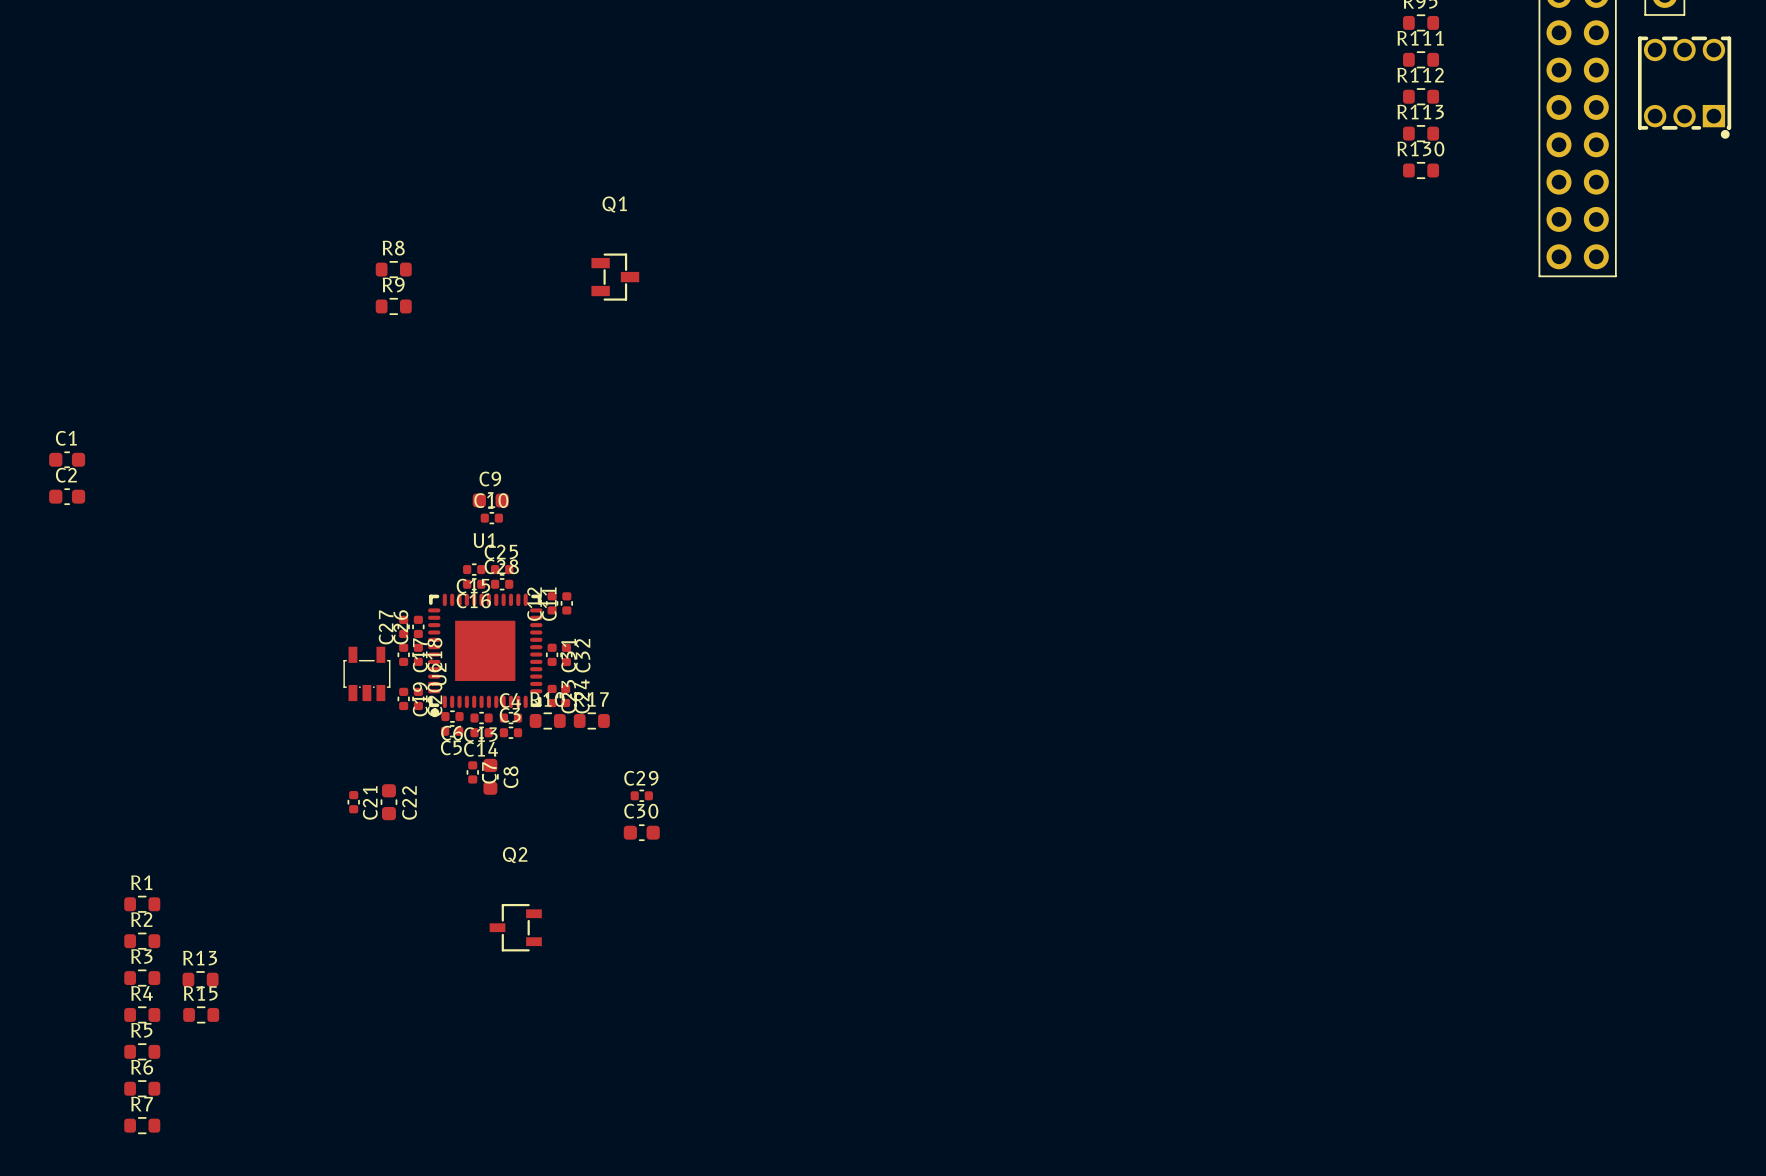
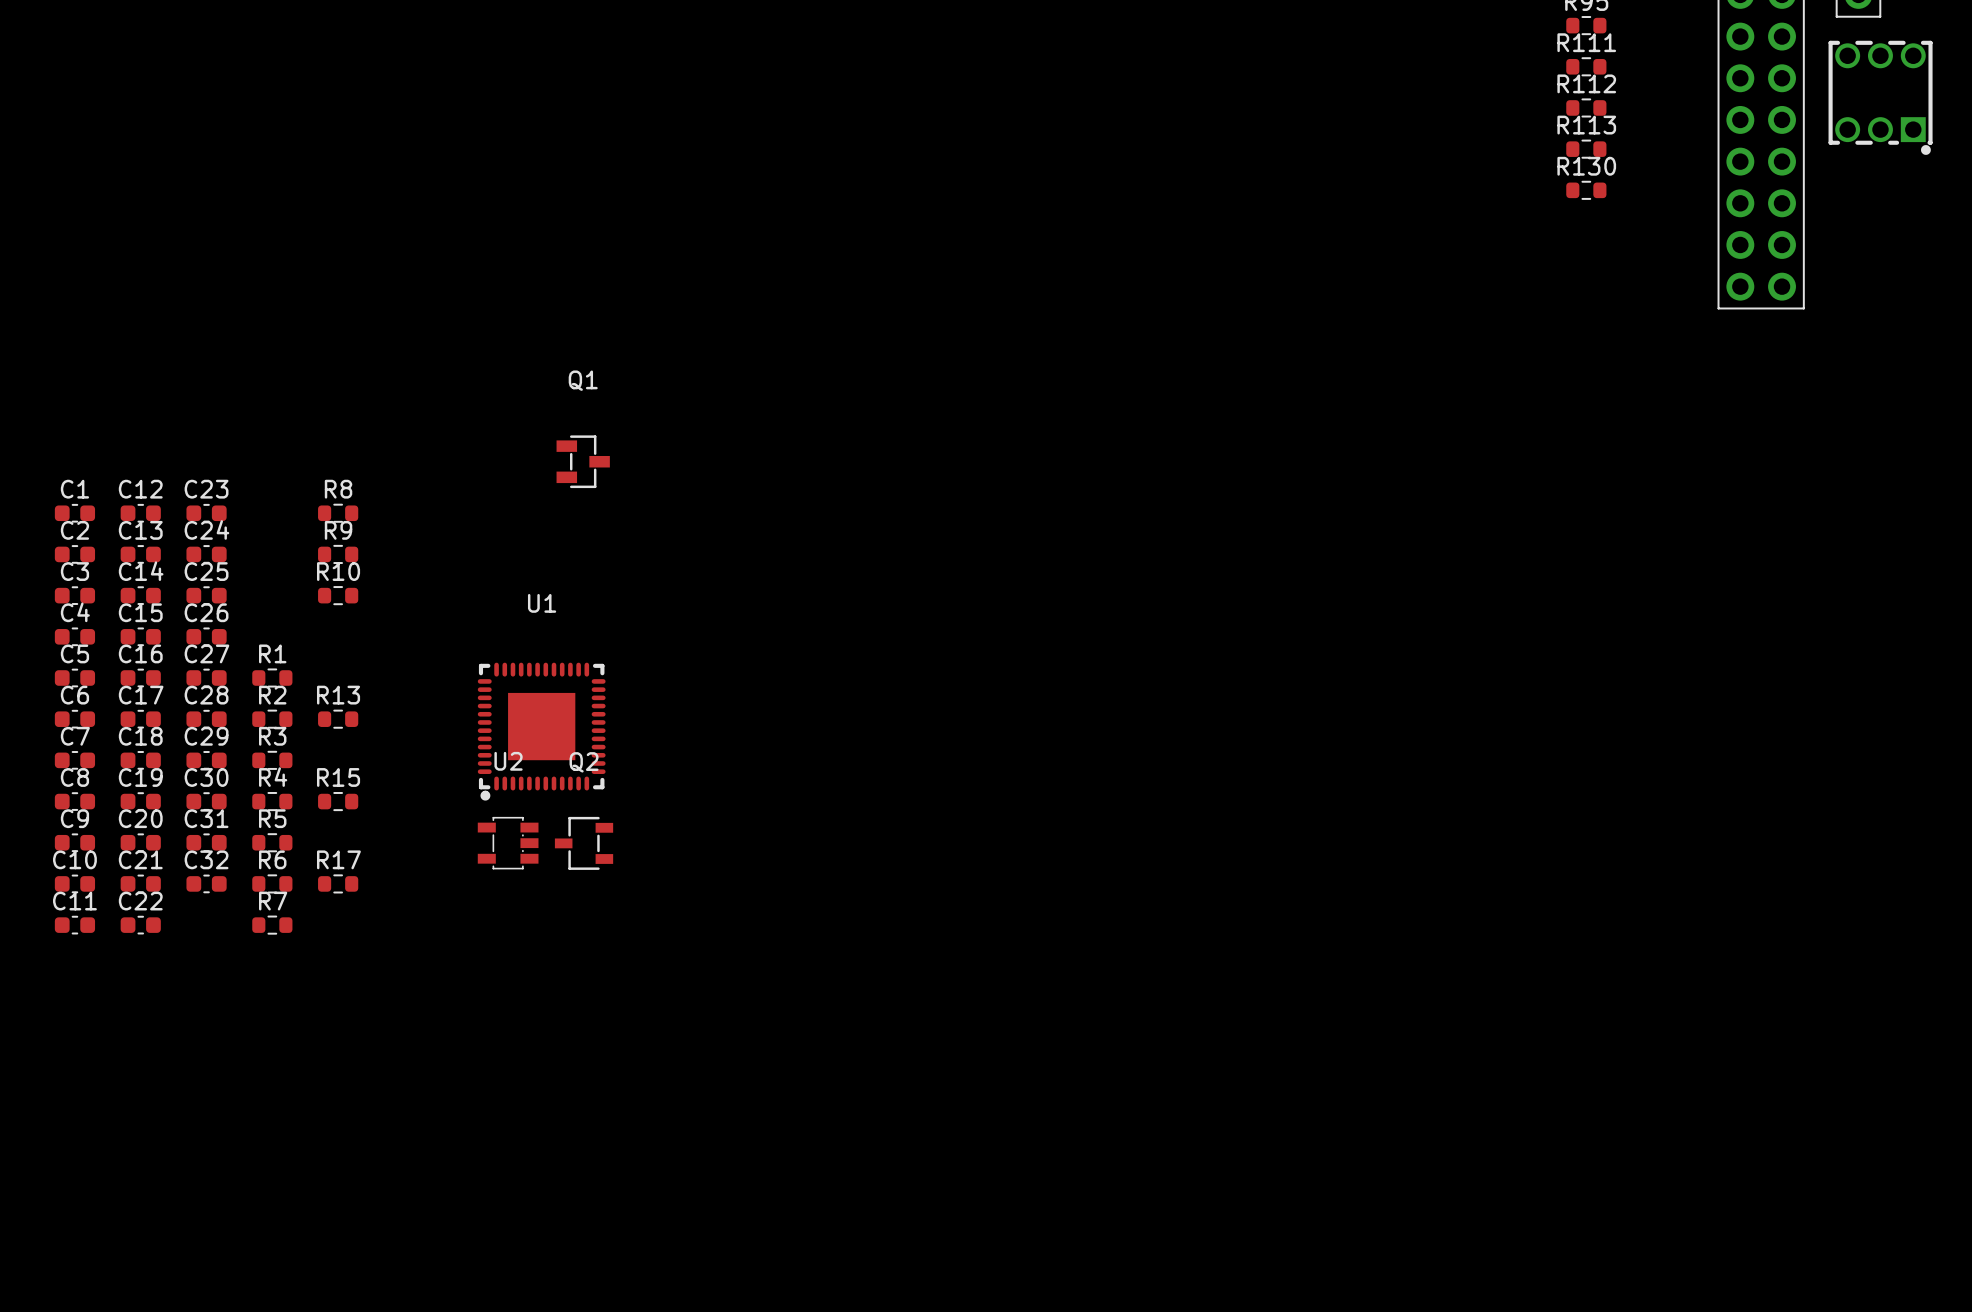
R8 position: (393, 269) -> (338, 513)
Q1 position: (615, 277) -> (583, 461)
R9 position: (393, 306) -> (338, 554)
C9 position: (490, 500) -> (74, 842)
C10 footprint: [480, 511, 504, 525] -> [54, 874, 96, 894]
C15 footprint: [463, 563, 486, 576] -> [120, 627, 161, 647]
C25 footprint: [490, 563, 514, 576] -> [186, 586, 227, 605]
C16 footprint: [463, 578, 486, 591] -> [120, 668, 161, 688]
C28 footprint: [490, 578, 514, 591] -> [186, 709, 227, 729]
C15 name position: C15 (473, 586) -> C15 (140, 612)
C12 footprint: [545, 592, 559, 615] -> [120, 503, 161, 523]
C11 footprint: [560, 592, 574, 615] -> [54, 915, 96, 935]
C16 name position: C16 (473, 600) -> C16 (140, 653)
C27 footprint: [397, 615, 410, 639] -> [186, 668, 227, 688]
C26 footprint: [412, 615, 425, 639] -> [186, 627, 227, 647]
C17 footprint: [397, 643, 410, 667] -> [120, 709, 161, 729]
C18 footprint: [412, 643, 425, 667] -> [120, 751, 161, 770]
C31 footprint: [545, 643, 559, 667] -> [186, 833, 227, 853]
C32 footprint: [560, 643, 573, 667] -> [186, 874, 227, 894]
U2 rotation: 0° (366, 673) -> 90° counterclockwise (508, 843)
U2 position: (366, 673) -> (508, 843)
C23 footprint: [545, 684, 559, 708] -> [186, 503, 227, 523]
C24 footprint: [559, 684, 572, 708] -> [186, 545, 227, 564]
C19 footprint: [397, 687, 410, 711] -> [120, 792, 161, 811]
C20 footprint: [412, 687, 425, 711] -> [120, 833, 161, 853]
C6 footprint: [441, 710, 464, 723] -> [54, 709, 96, 729]
C13 footprint: [470, 711, 493, 725] -> [120, 545, 161, 564]
C4 footprint: [499, 711, 523, 725] -> [54, 627, 96, 647]
R10 position: (547, 720) -> (338, 595)
R17 position: (591, 720) -> (338, 883)
C5 footprint: [441, 725, 464, 738] -> [54, 668, 96, 688]
C14 footprint: [470, 726, 493, 739] -> [120, 586, 161, 605]
C3 footprint: [499, 726, 523, 739] -> [54, 586, 96, 605]
C6 name position: C6 (452, 733) -> C6 (74, 695)
C13 name position: C13 (480, 734) -> C13 (140, 530)
C5 name position: C5 (451, 747) -> C5 (74, 653)
C14 name position: C14 (481, 749) -> C14 (141, 571)
C7 footprint: [466, 761, 479, 784] -> [54, 751, 96, 770]
C8 rotation: 0° (490, 776) -> 90° clockwise (74, 801)
C8 position: (490, 776) -> (74, 801)
C8 name position: C8 (510, 777) -> C8 (74, 777)
C29 footprint: [630, 789, 653, 802] -> [186, 751, 227, 770]
C21 footprint: [347, 791, 360, 814] -> [120, 874, 161, 894]
C22 rotation: 0° (388, 802) -> 90° clockwise (140, 925)
C22 position: (388, 802) -> (140, 925)
C22 name position: C22 (409, 802) -> C22 (140, 901)
C30 position: (641, 832) -> (206, 801)
R1 position: (142, 904) -> (272, 678)
Q2 position: (515, 927) -> (584, 843)
R2 position: (142, 941) -> (272, 719)
R3 position: (142, 978) -> (272, 760)
R13 position: (200, 979) -> (338, 719)
R4 position: (142, 1014) -> (272, 801)
R15 position: (201, 1014) -> (338, 801)
R5 position: (142, 1051) -> (272, 842)
R6 position: (142, 1088) -> (272, 883)
R7 position: (142, 1125) -> (272, 925)

